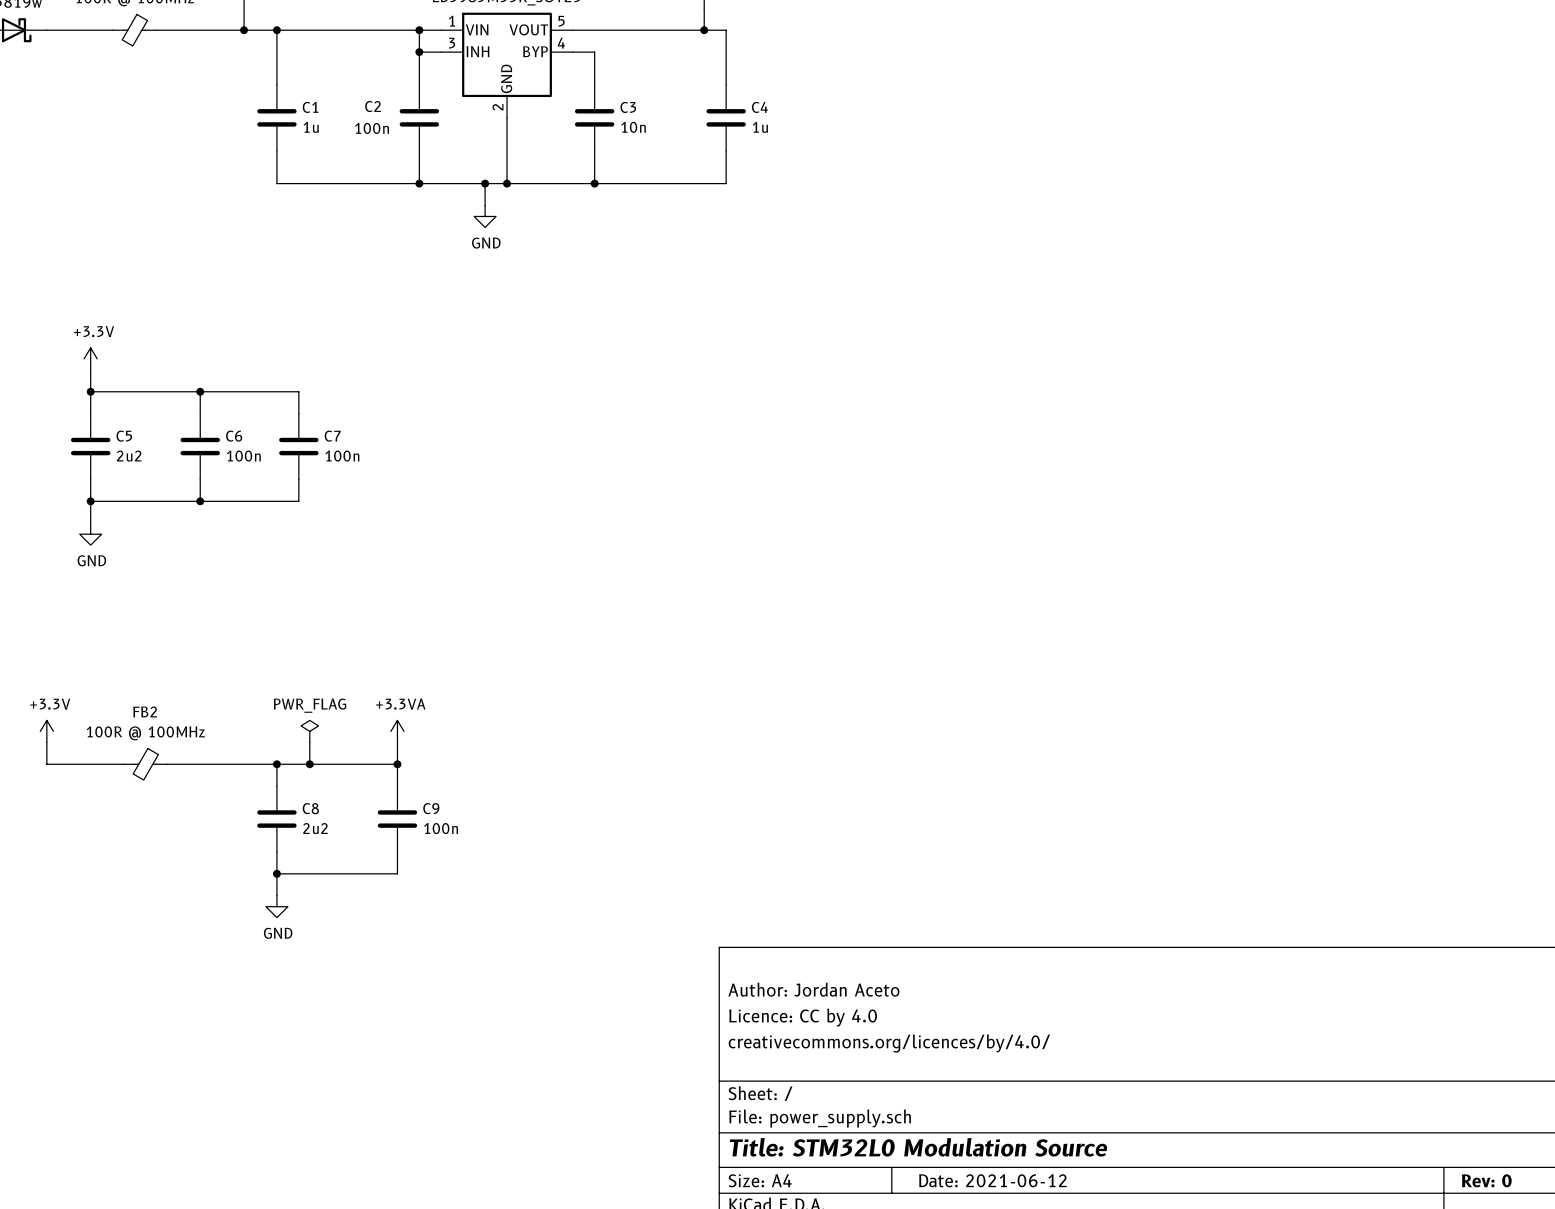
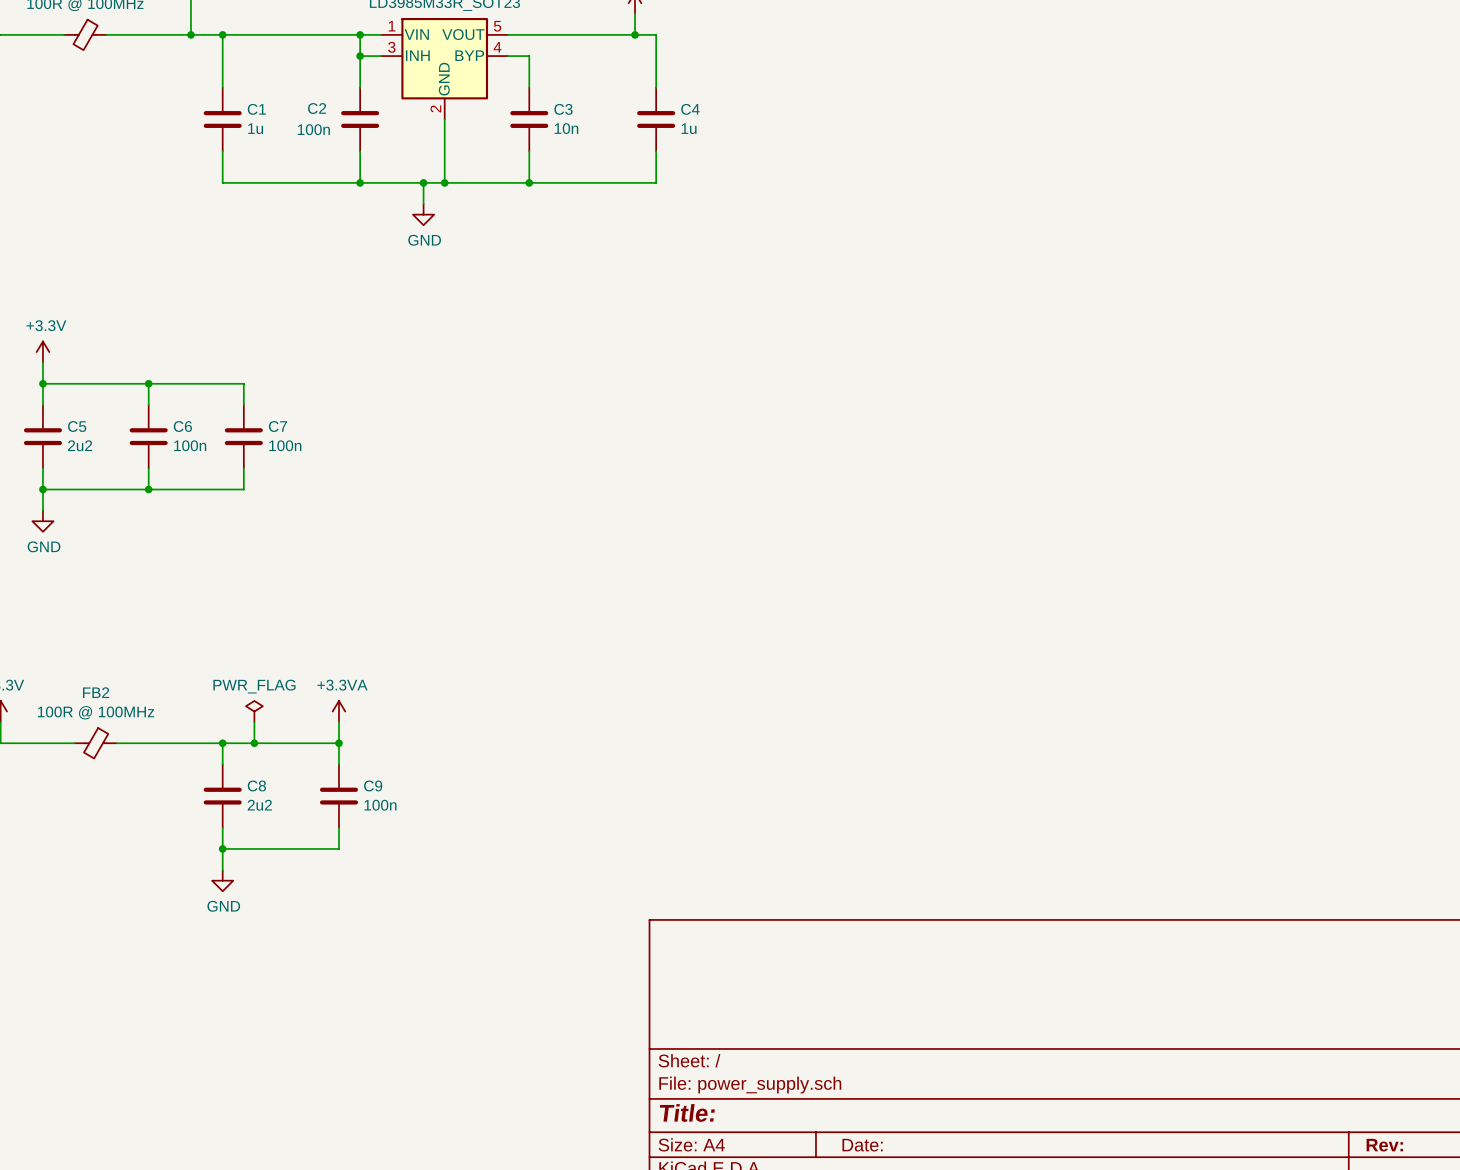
title block: Author: Jordan Aceto (813, 989) -> none
title block: Licence: CC by 4.0 (803, 1017) -> none
title block: creativecommons.org/licences/by/4.0/ (889, 1043) -> none
title block: Title: STM32L0 Modulation Source (918, 1147) -> Title: (687, 1112)
title block: Date: 2021-06-12 (992, 1180) -> Date: (862, 1145)
title block: Rev: 0 (1486, 1180) -> Rev: (1384, 1145)

